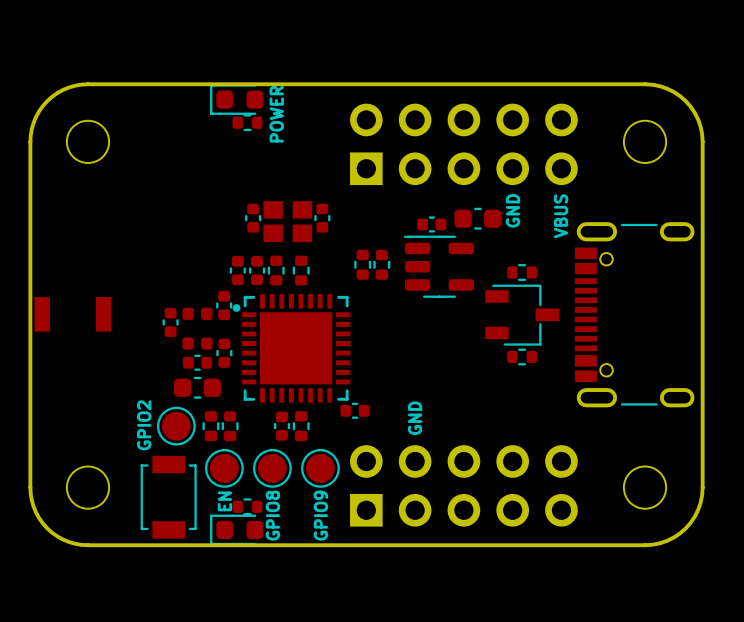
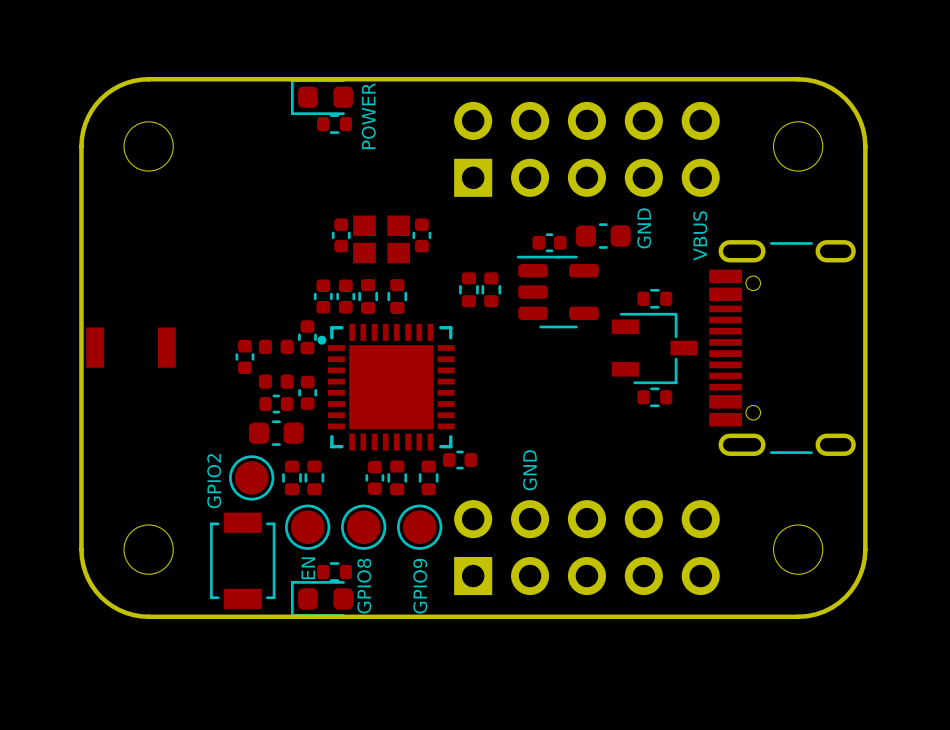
part footprint: [574, 222, 695, 408] -> [709, 240, 856, 456]
part: none -> (428, 477)

